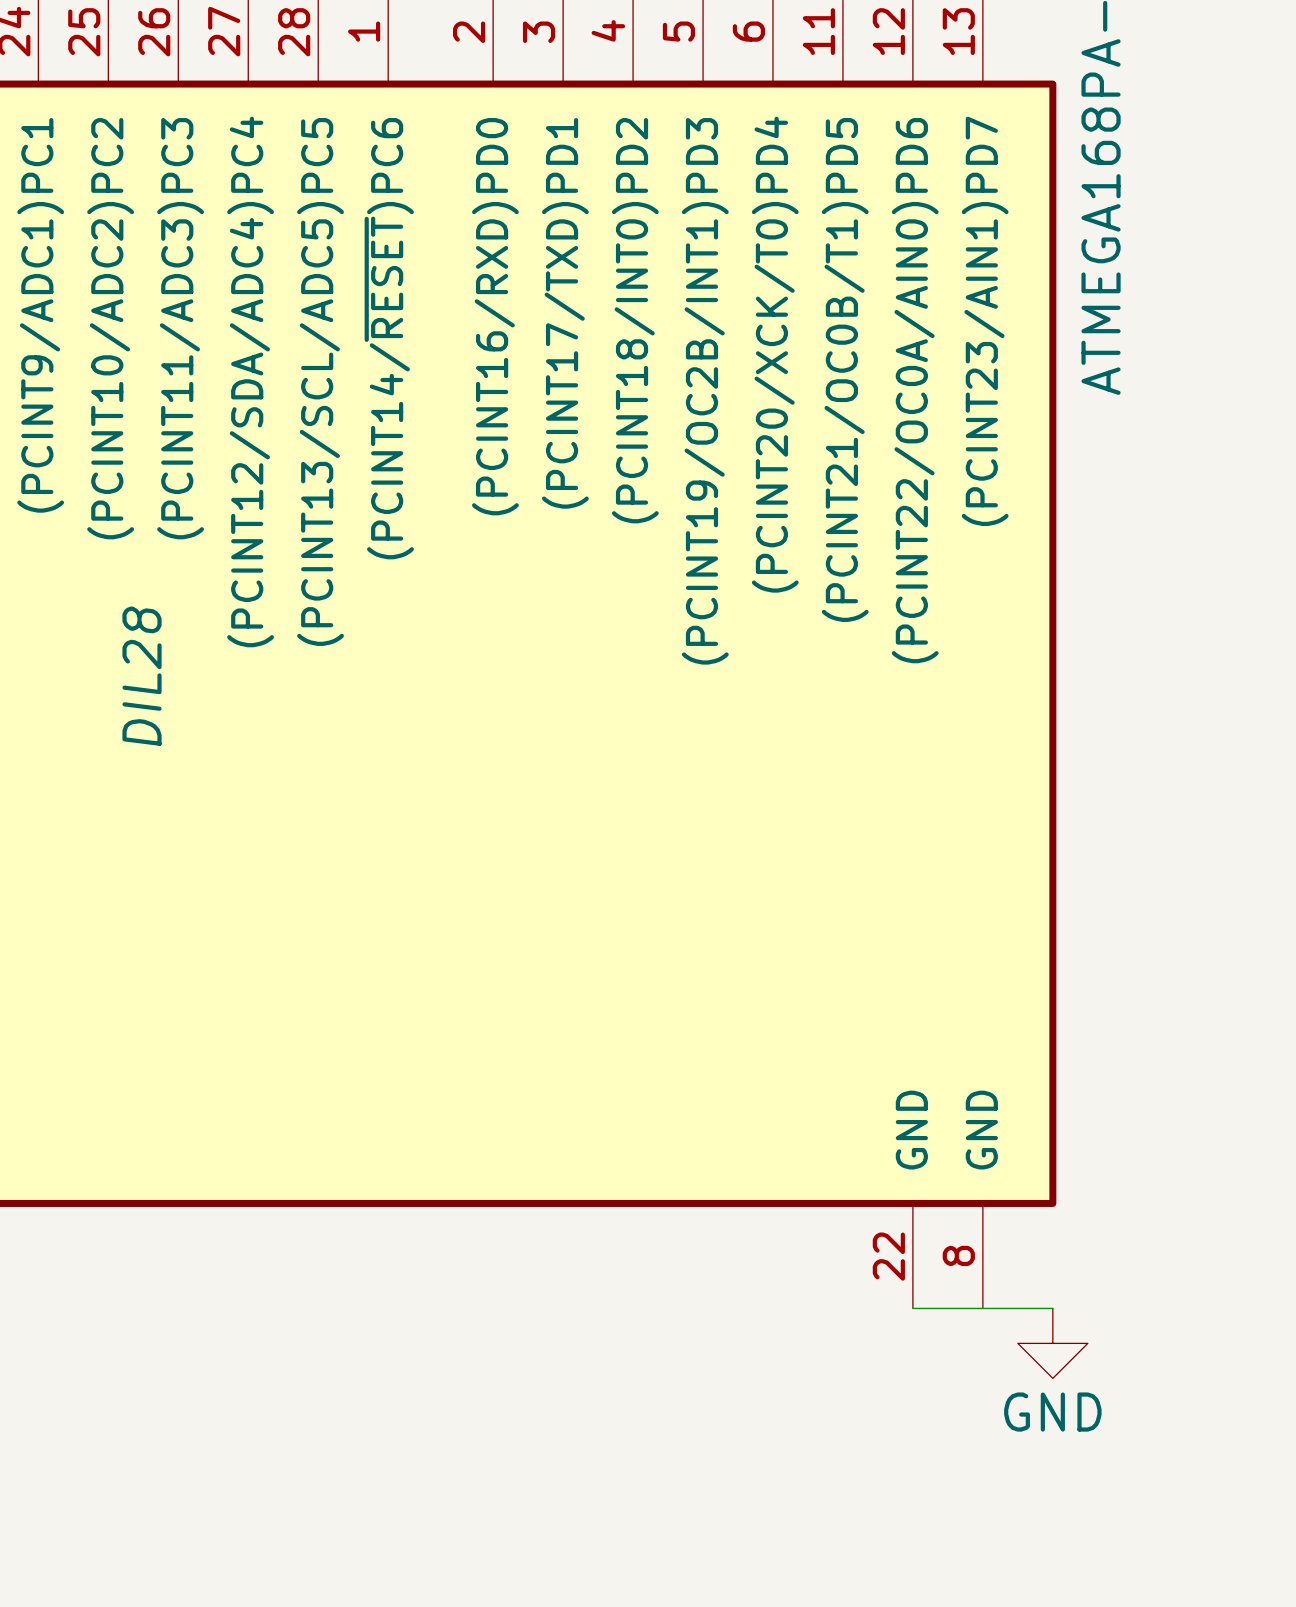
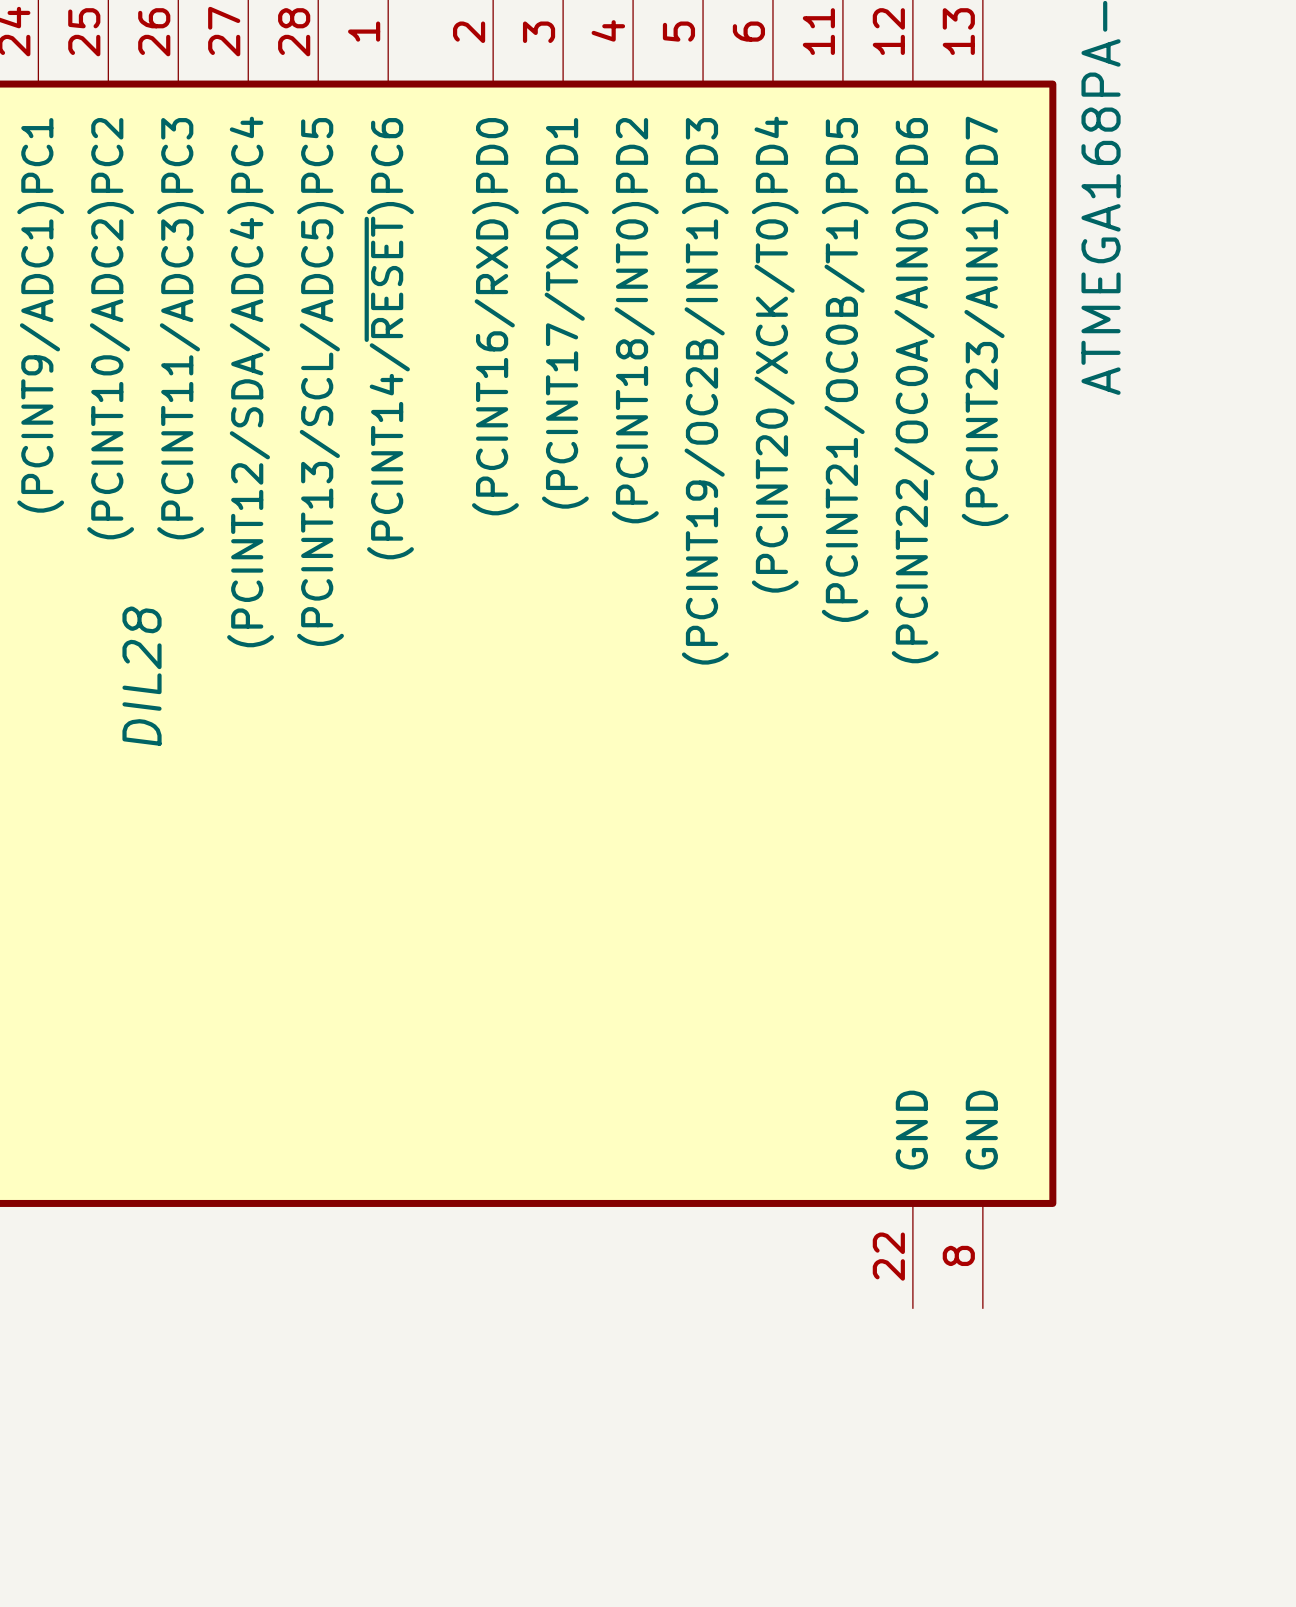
wire: (912, 1308) (1052, 1308) -> none
power symbol: GND (1052, 1343) -> none

